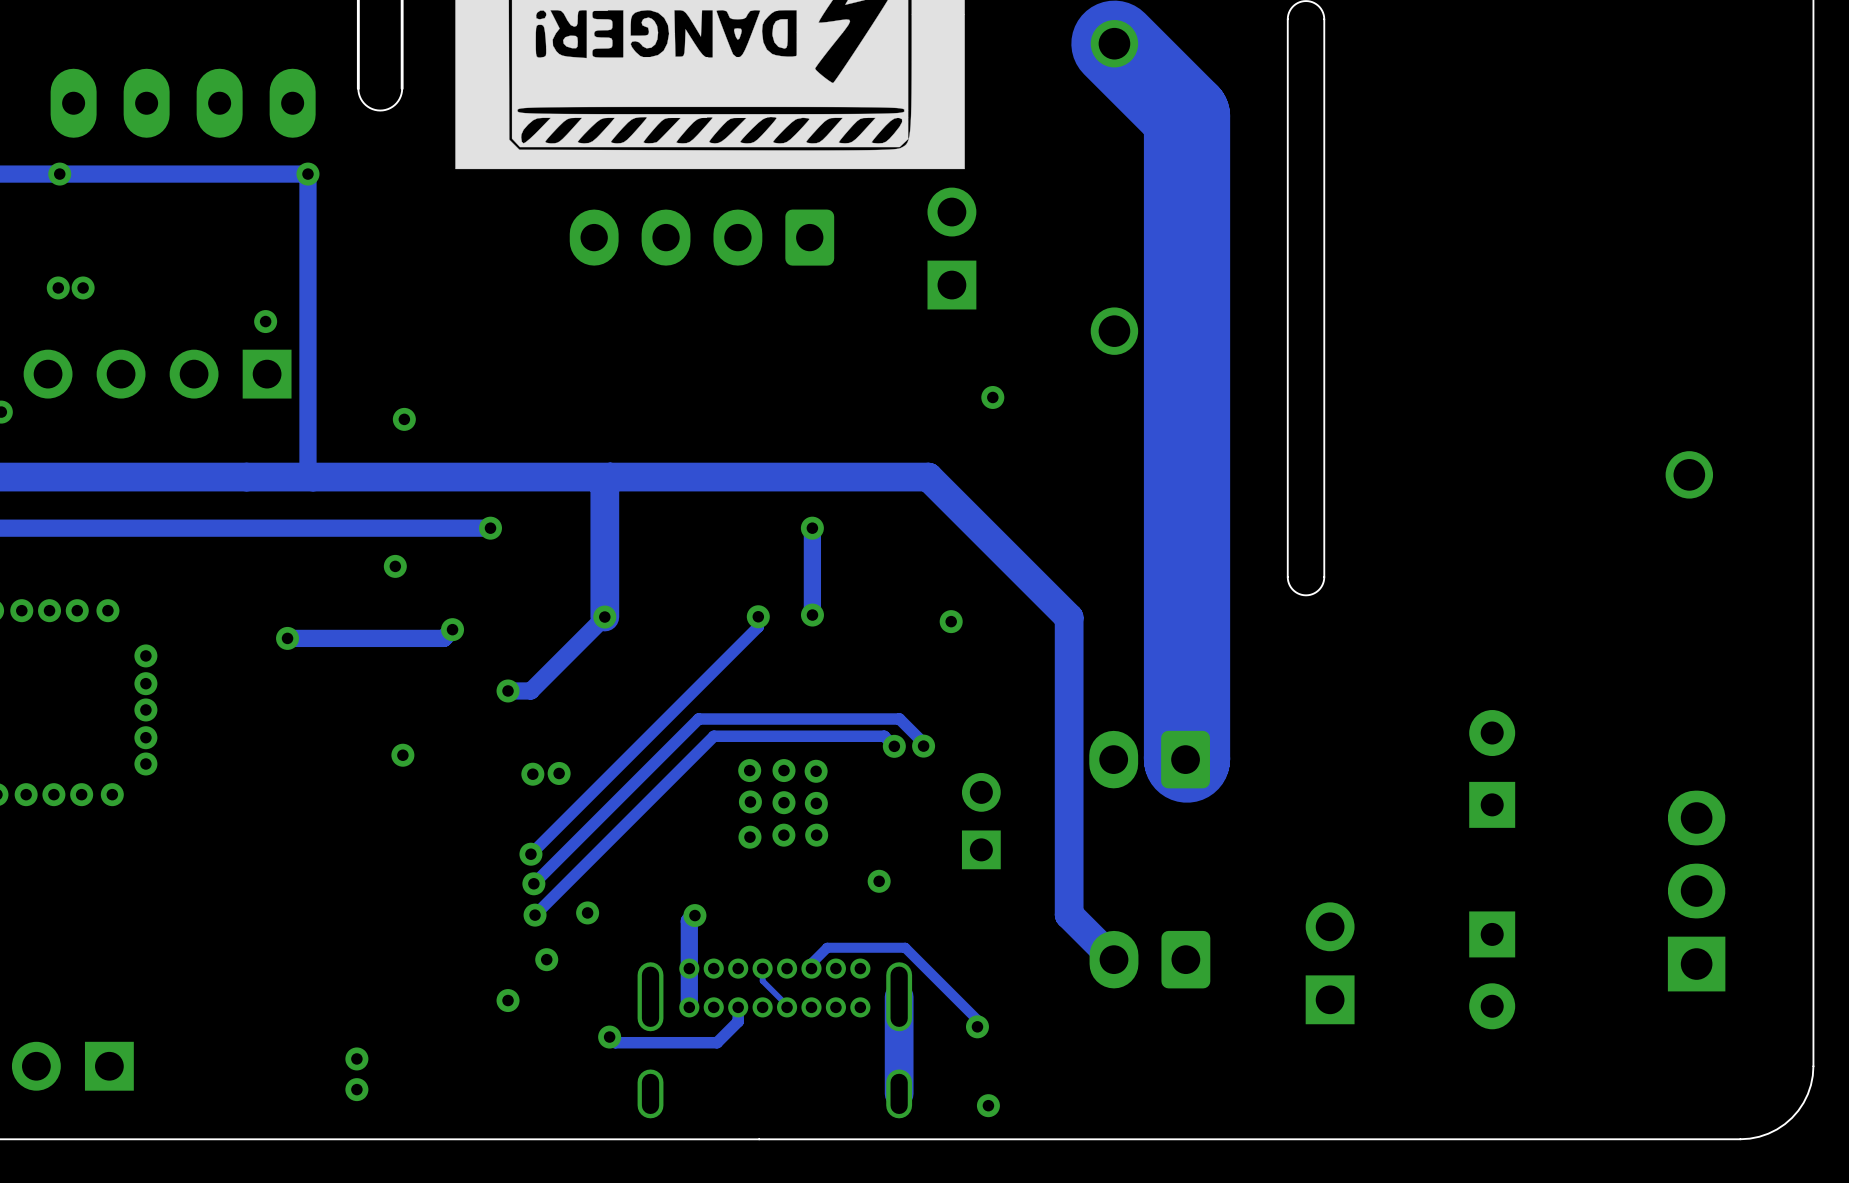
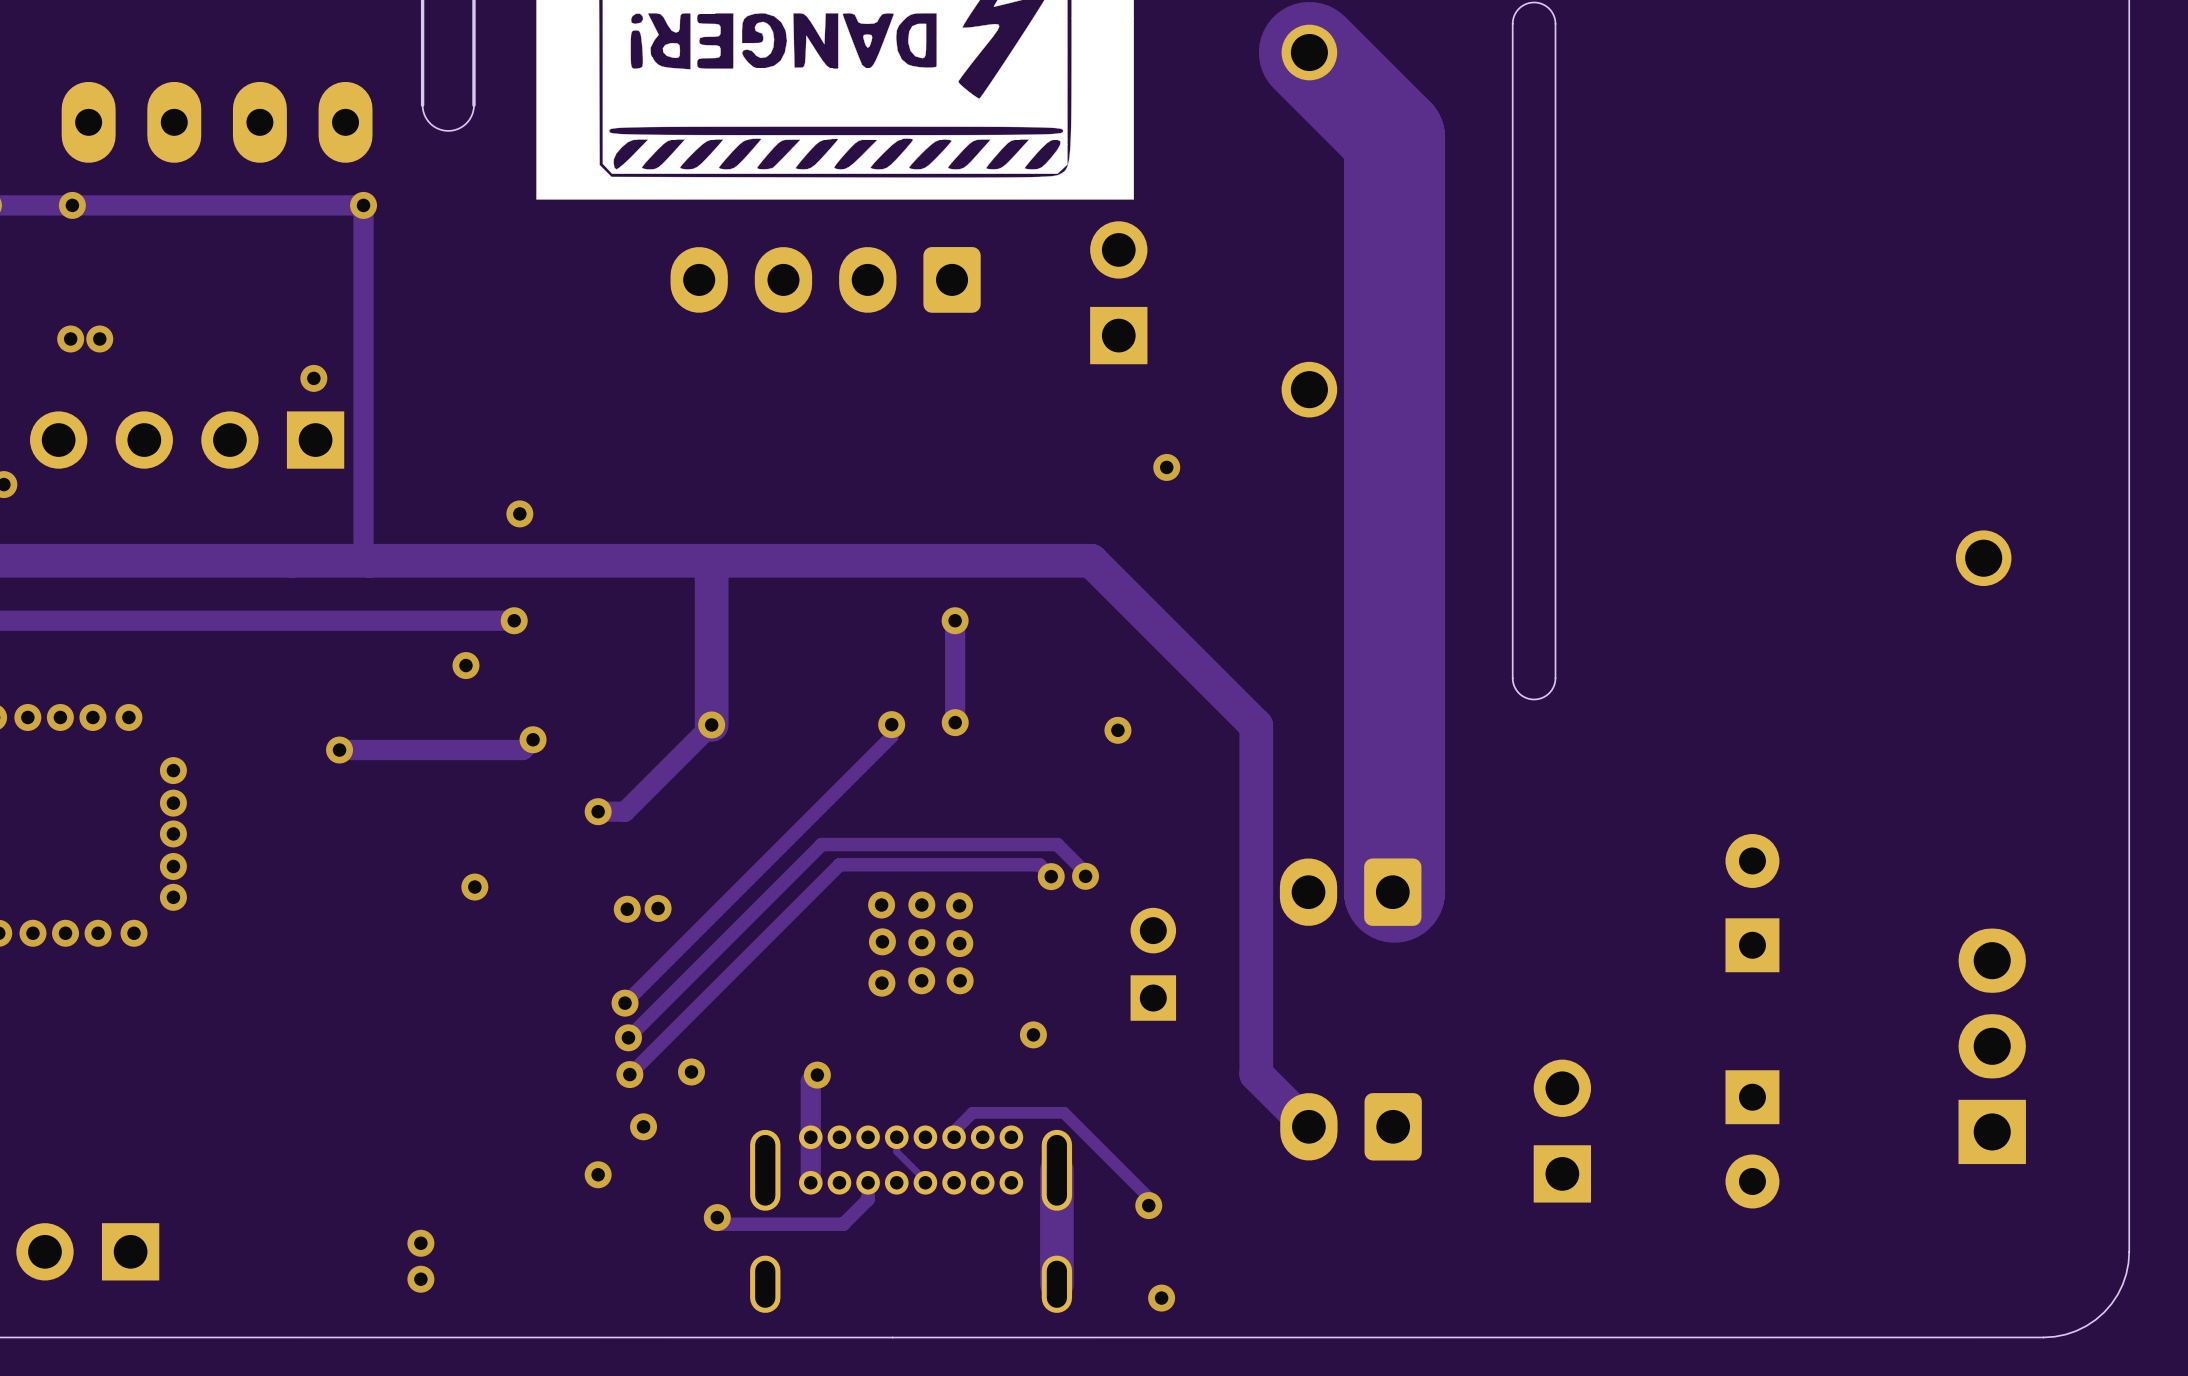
via position: (404, 419) -> (519, 513)
via: none -> (514, 620)
track: (490, 528) (436, 528) -> none
via: (490, 528) -> none

